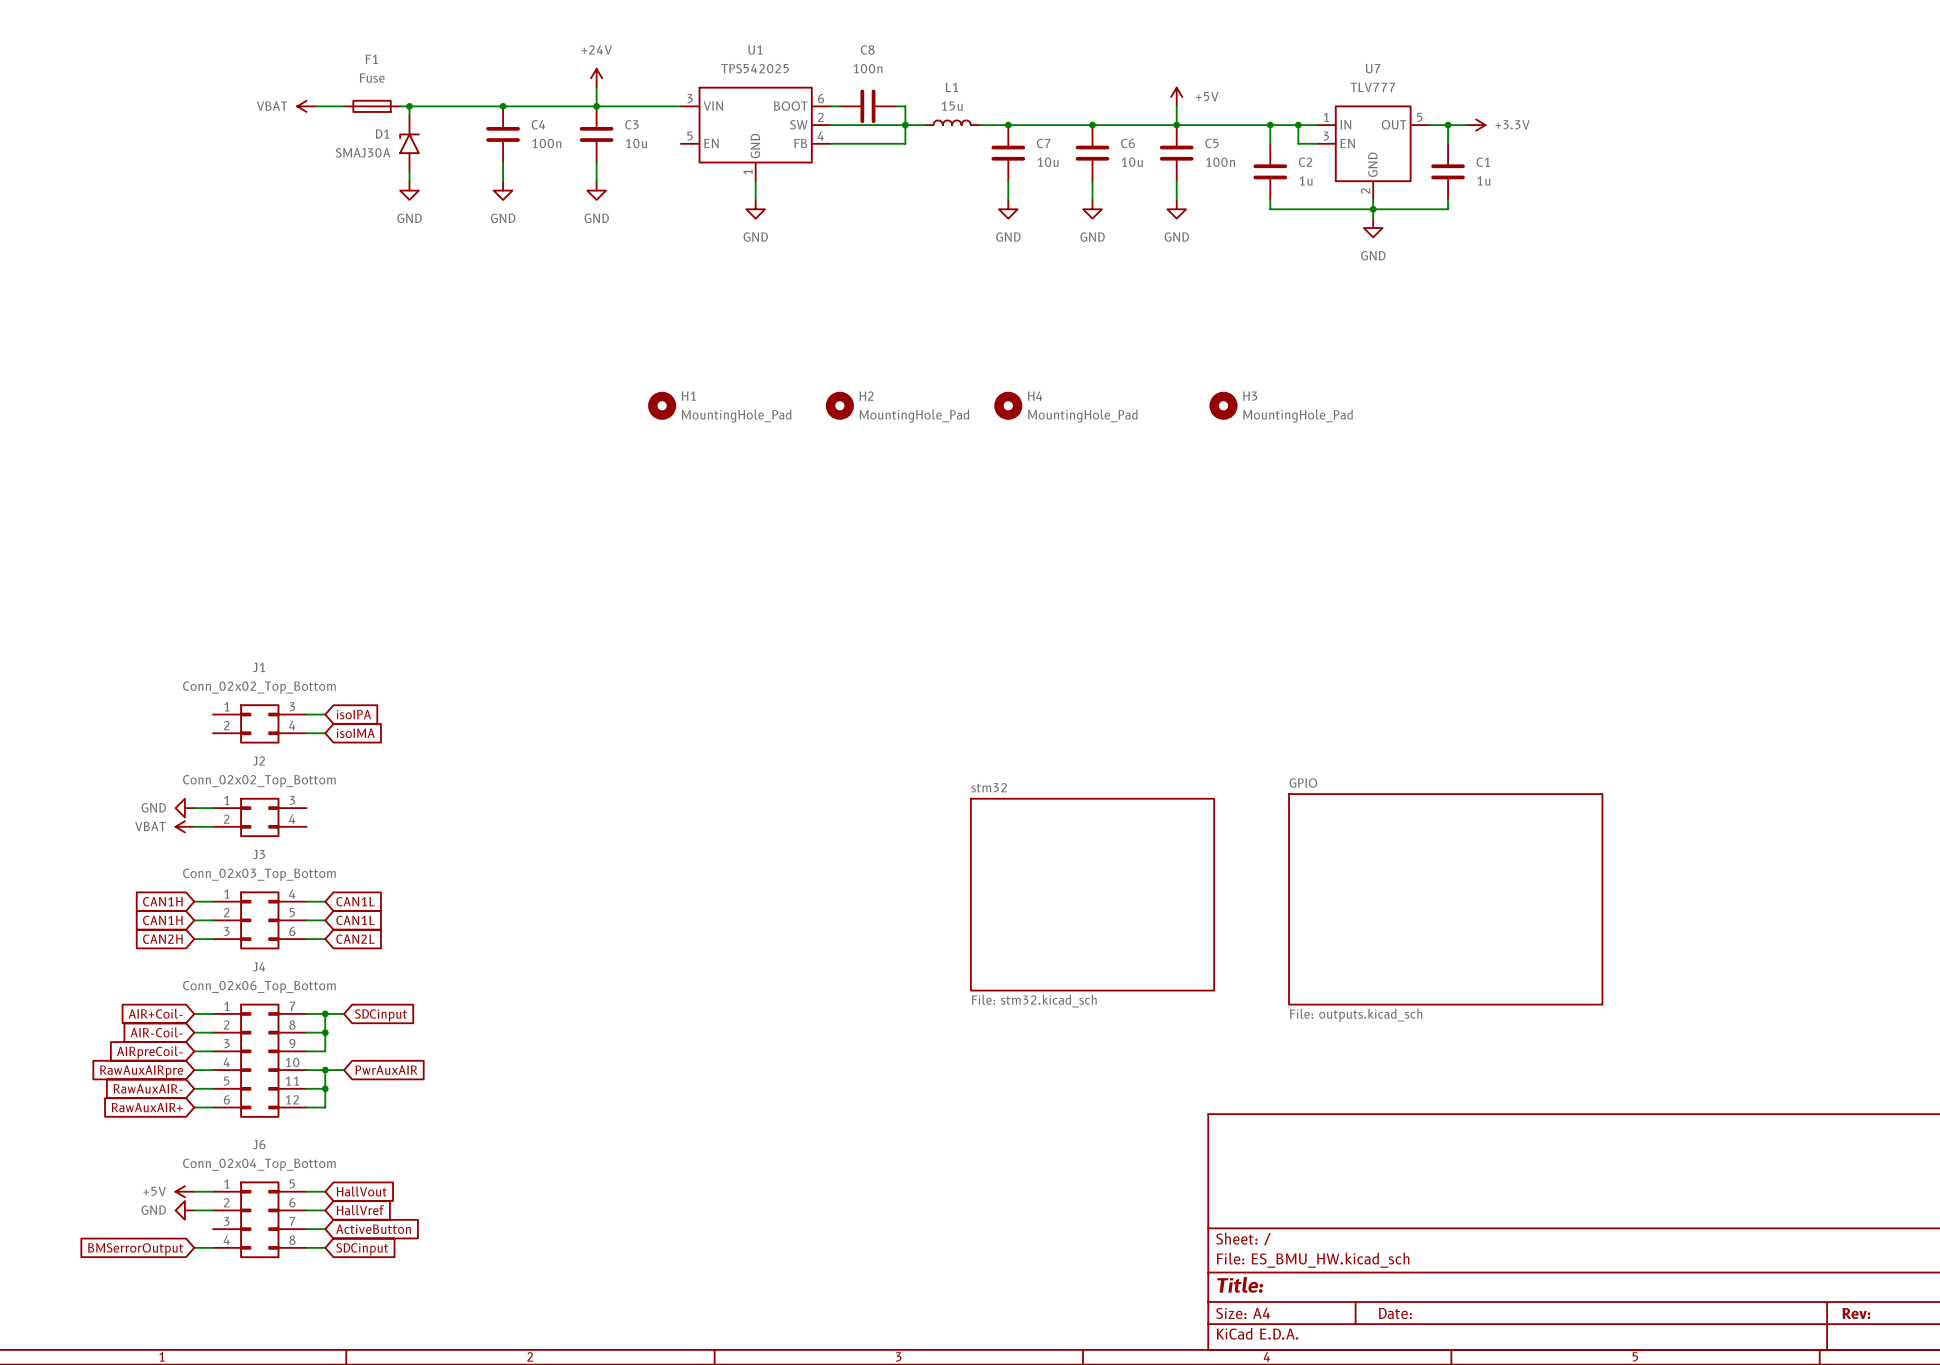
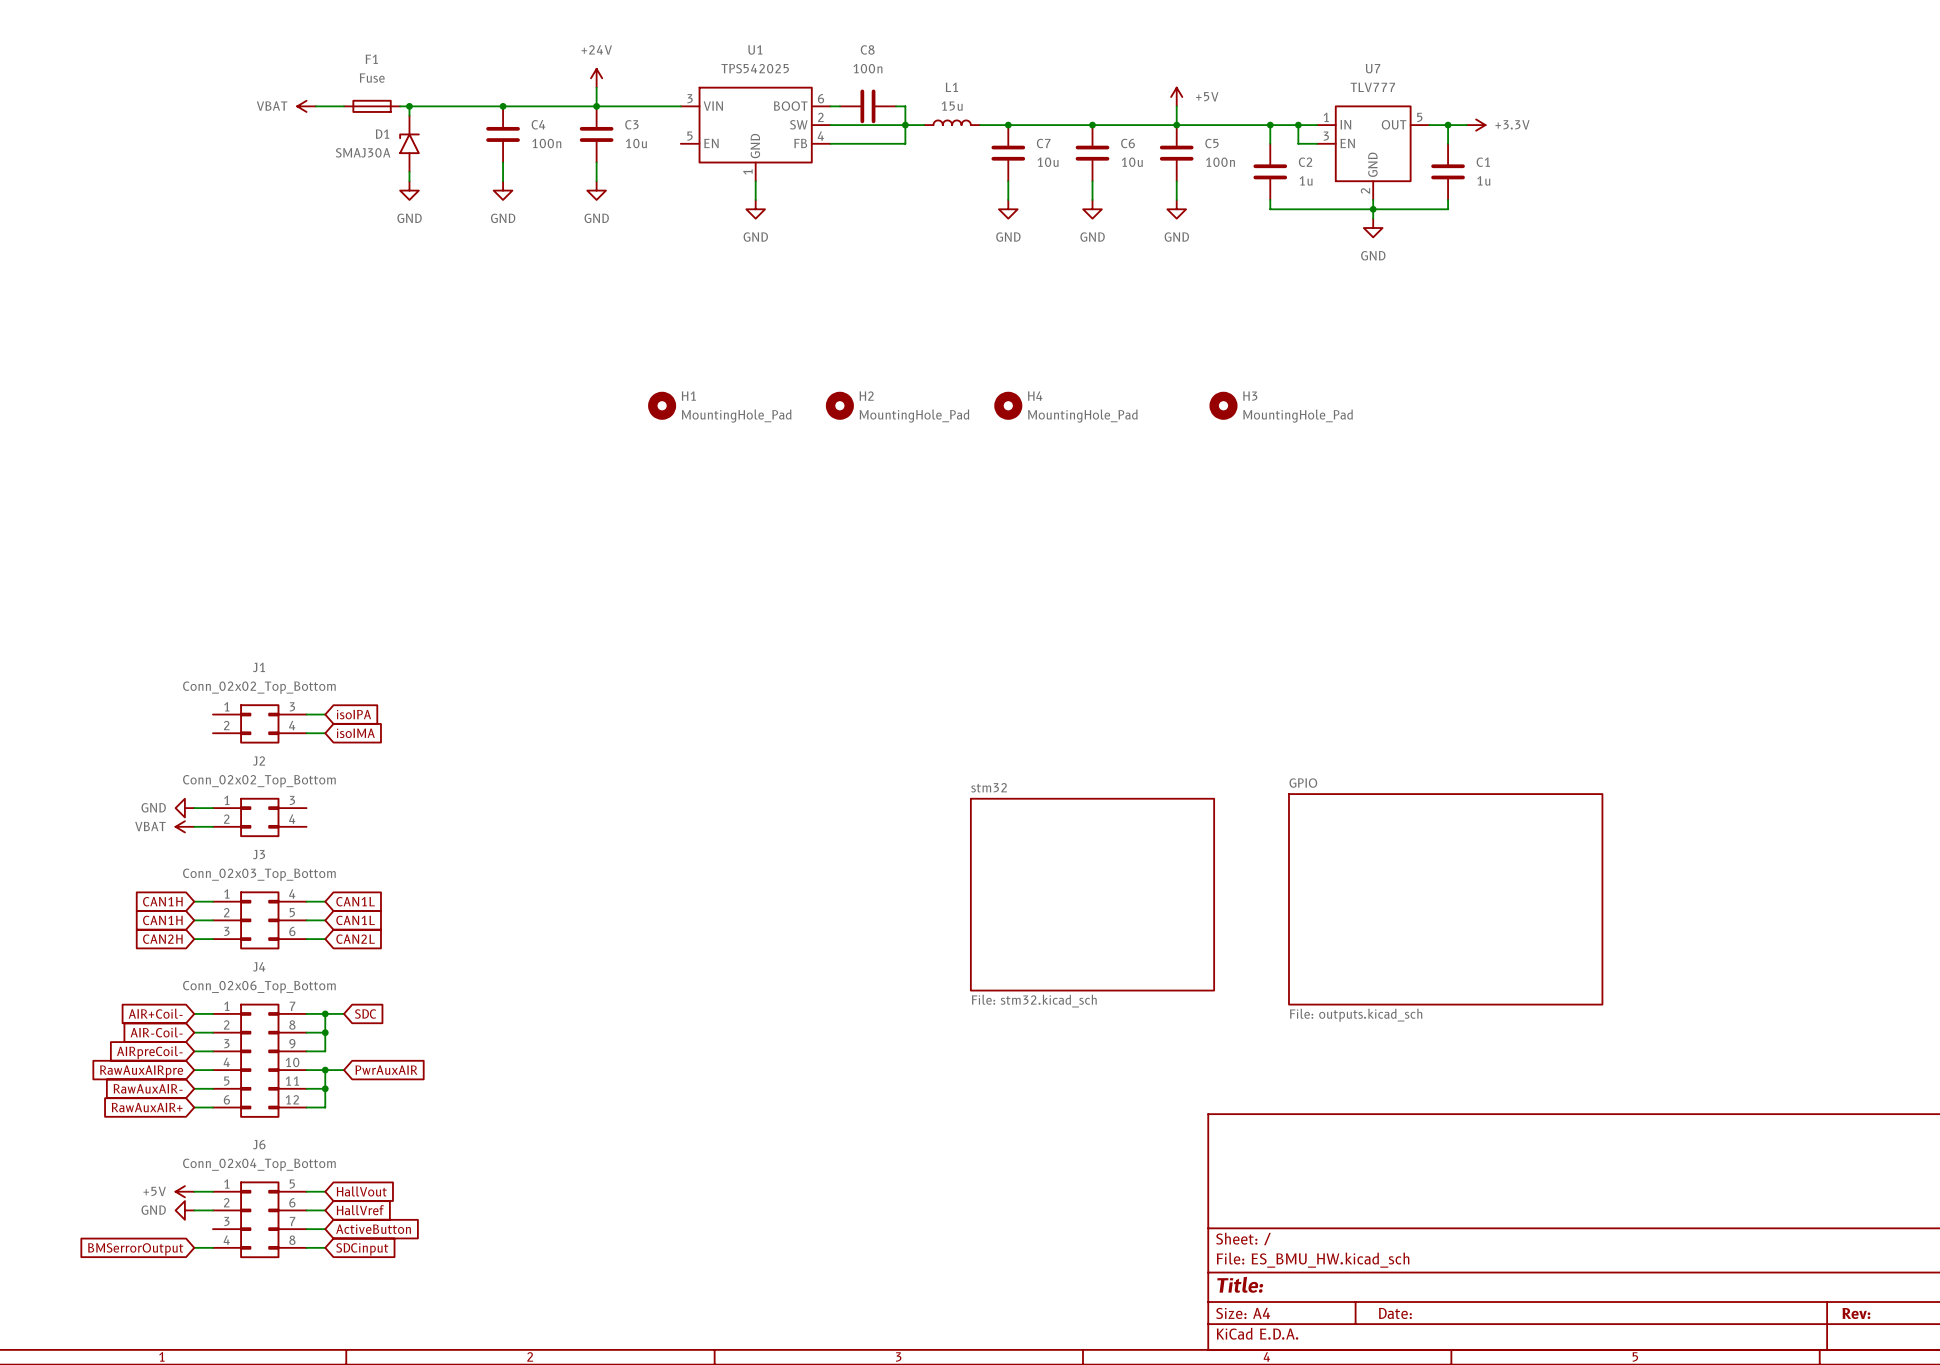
global label: SDCinput (381, 1015) -> SDC (365, 1014)

